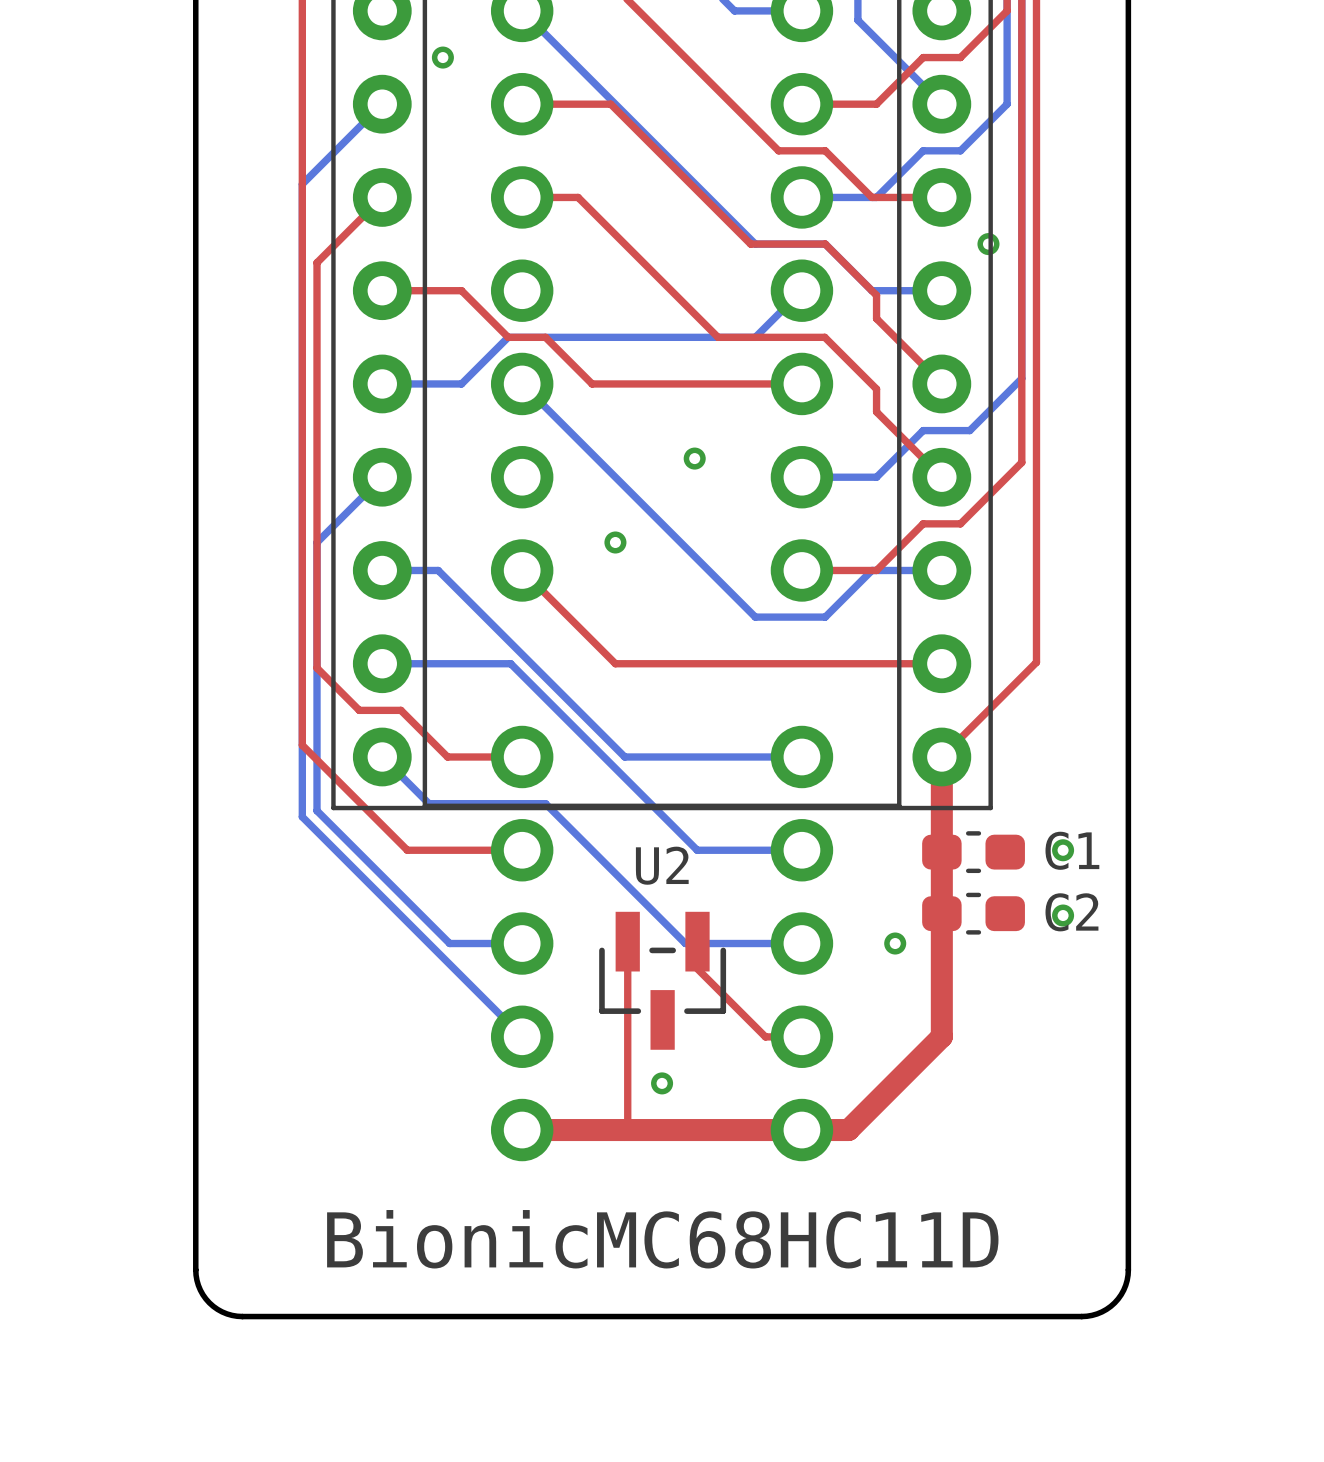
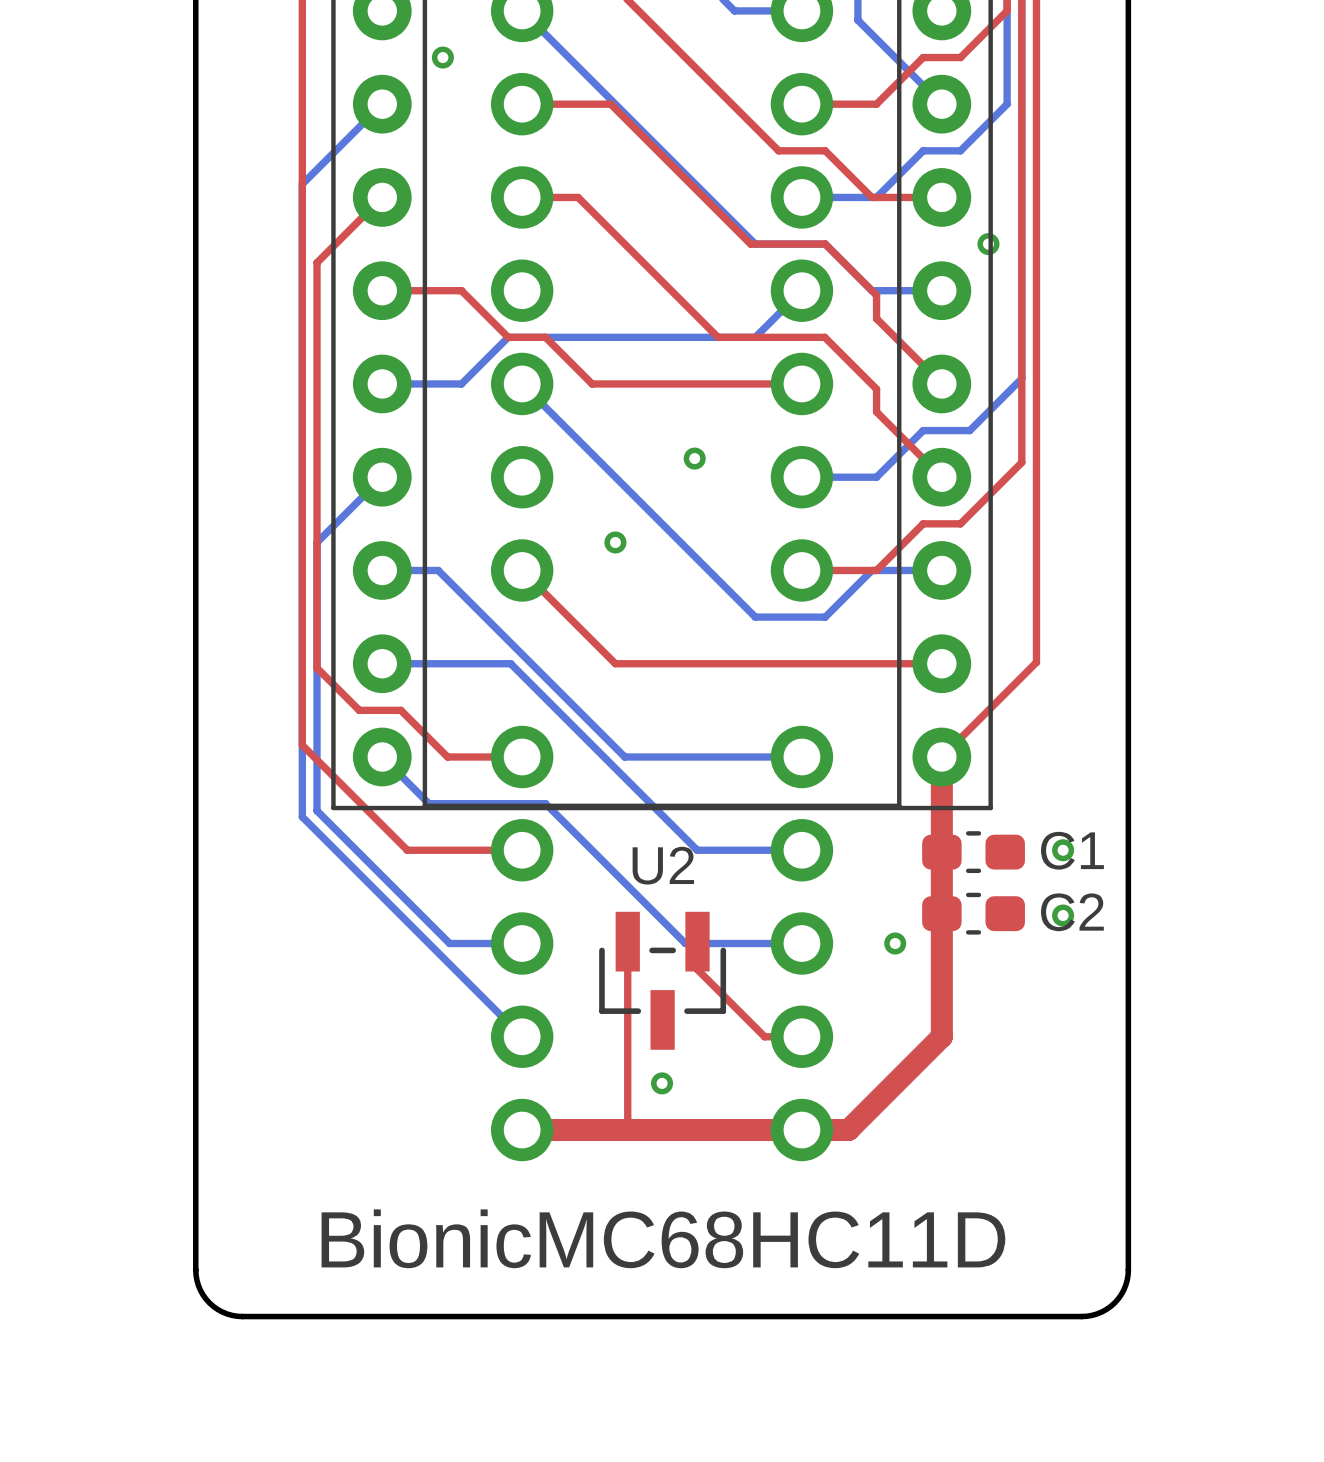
top track: (697, 968) (765, 1036) -> (696, 951) (696, 969) (765, 1036)

